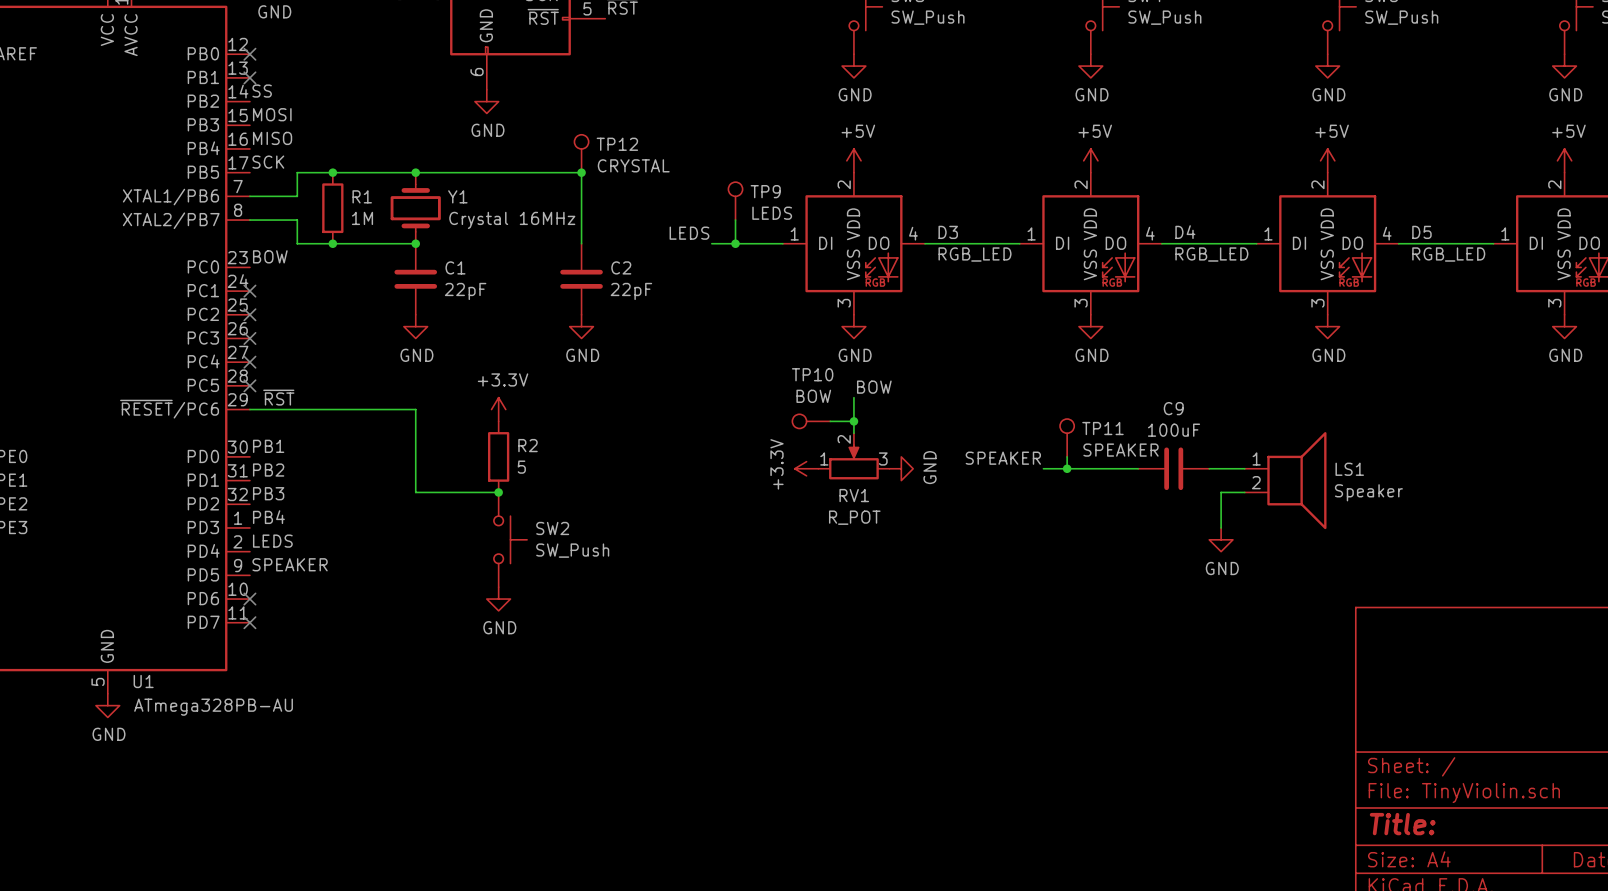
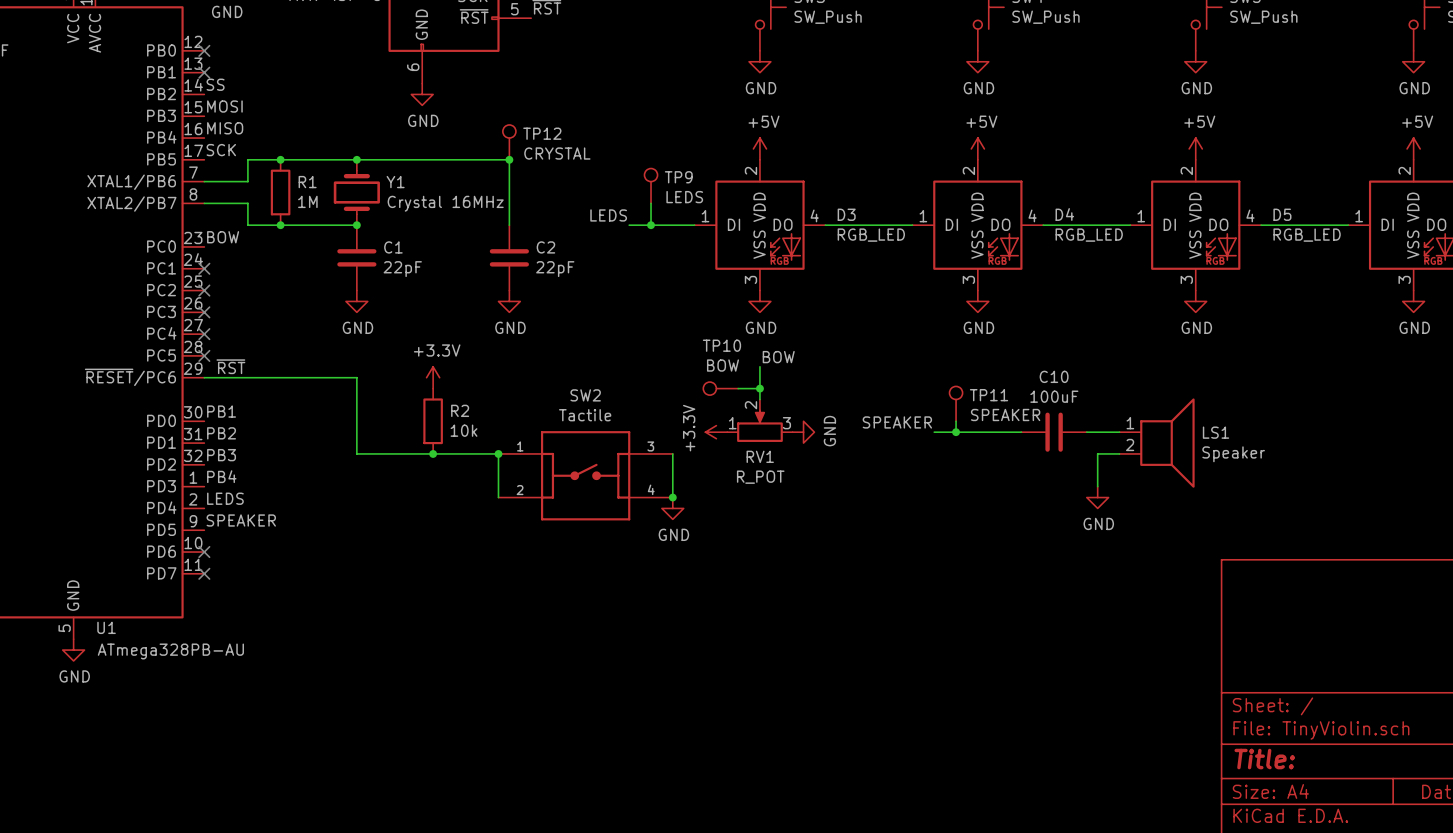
C9 name: C9 (1173, 408) -> C10 (1054, 376)
R2 value: 5 (521, 467) -> 10k (464, 430)
SW2 symbol: [493, 492, 528, 588] -> [498, 431, 673, 521]
wire: none -> (433, 453) (498, 453) (498, 497)
junction: none -> (498, 453)
wire: none -> (672, 453) (672, 497)
SW2 name position: SW2 (552, 528) -> SW2 (585, 395)
junction: none -> (672, 497)
SW2 value: SW_Push (572, 550) -> Tactile (585, 415)
power symbol: none -> GND (672, 508)
power symbol: GND (498, 599) -> none

